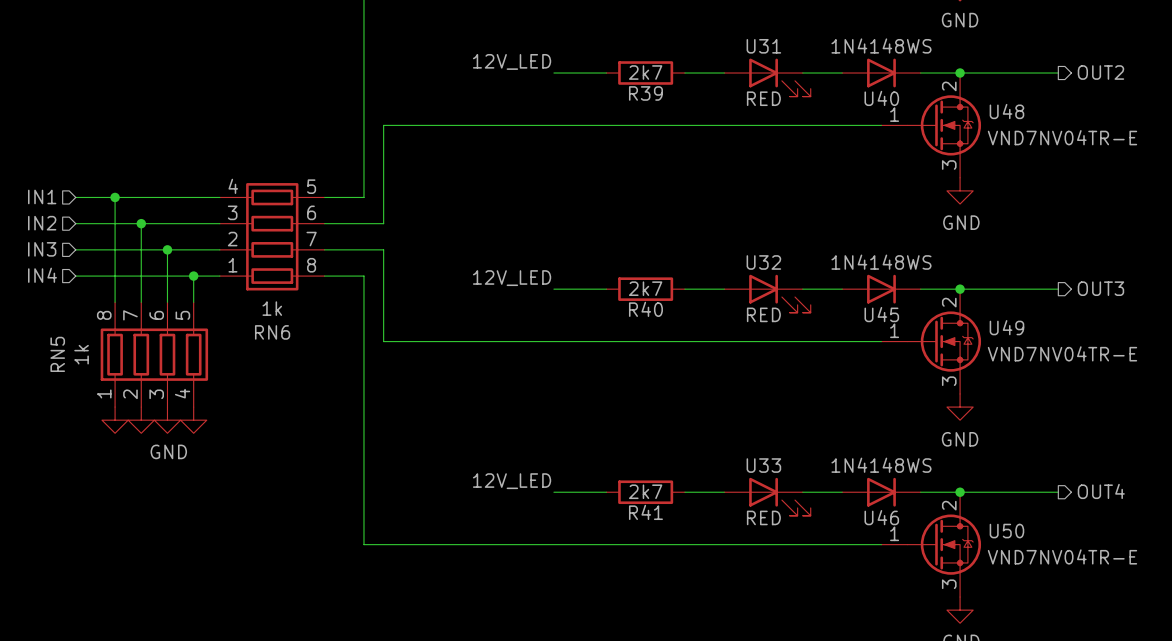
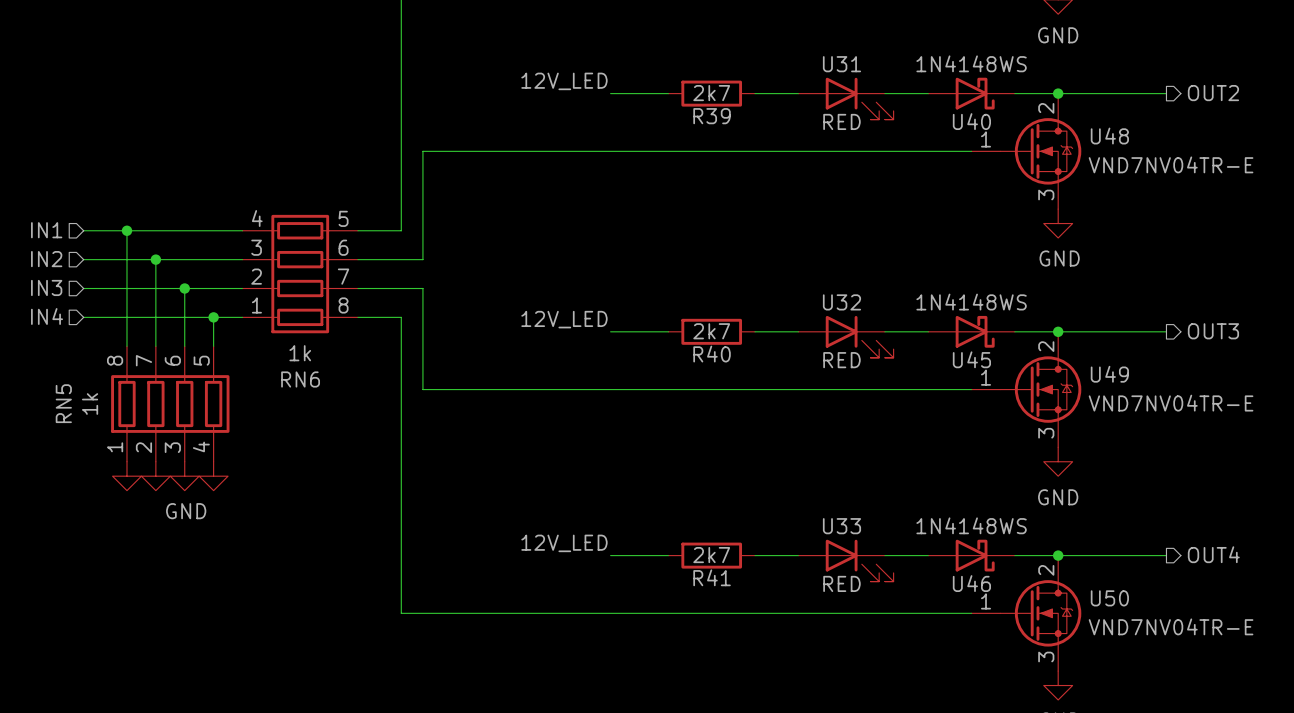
U40 symbol: [842, 58, 921, 88] -> [928, 77, 1015, 110]
U45 symbol: [842, 274, 921, 304] -> [928, 315, 1015, 348]
U46 symbol: [842, 477, 921, 507] -> [928, 539, 1015, 572]

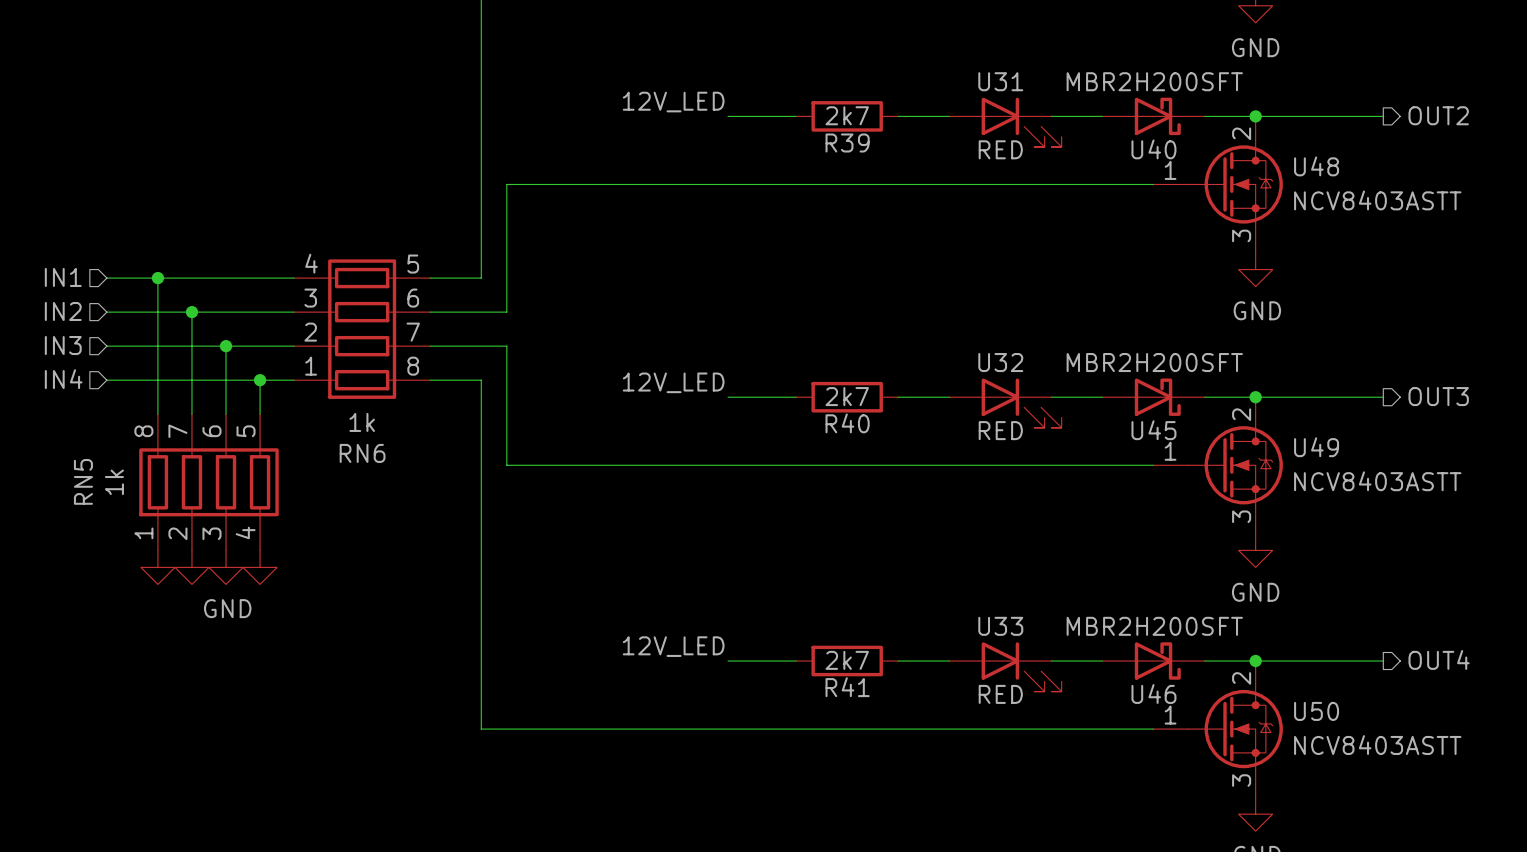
U40 value: 1N4148WS (971, 63) -> MBR2H200SFT (1154, 81)
U48 value: VND7NV04TR-E (1171, 164) -> NCV8403ASTT (1377, 200)
U45 value: 1N4148WS (971, 302) -> MBR2H200SFT (1154, 362)
U49 value: VND7NV04TR-E (1171, 403) -> NCV8403ASTT (1377, 481)
U46 value: 1N4148WS (971, 525) -> MBR2H200SFT (1154, 626)
U50 value: VND7NV04TR-E (1171, 626) -> NCV8403ASTT (1377, 745)

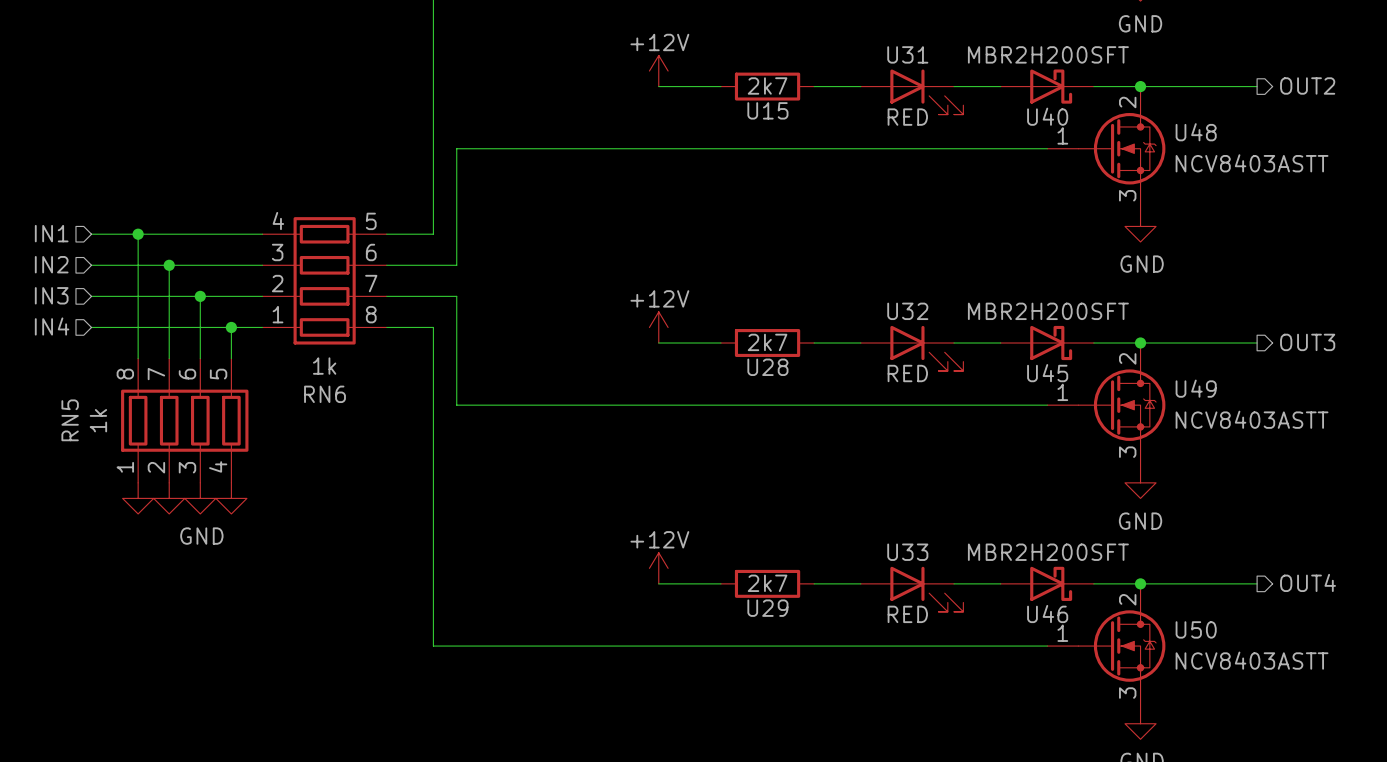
power symbol: none -> +12V (658, 71)
label: 12V_LED (673, 102) -> none
R39 name: R39 (847, 142) -> U15 (767, 110)
power symbol: none -> +12V (658, 327)
label: 12V_LED (673, 382) -> none
R40 name: R40 (847, 423) -> U28 (767, 367)
power symbol: none -> +12V (658, 568)
label: 12V_LED (673, 646) -> none
R41 name: R41 (847, 687) -> U29 (767, 608)

